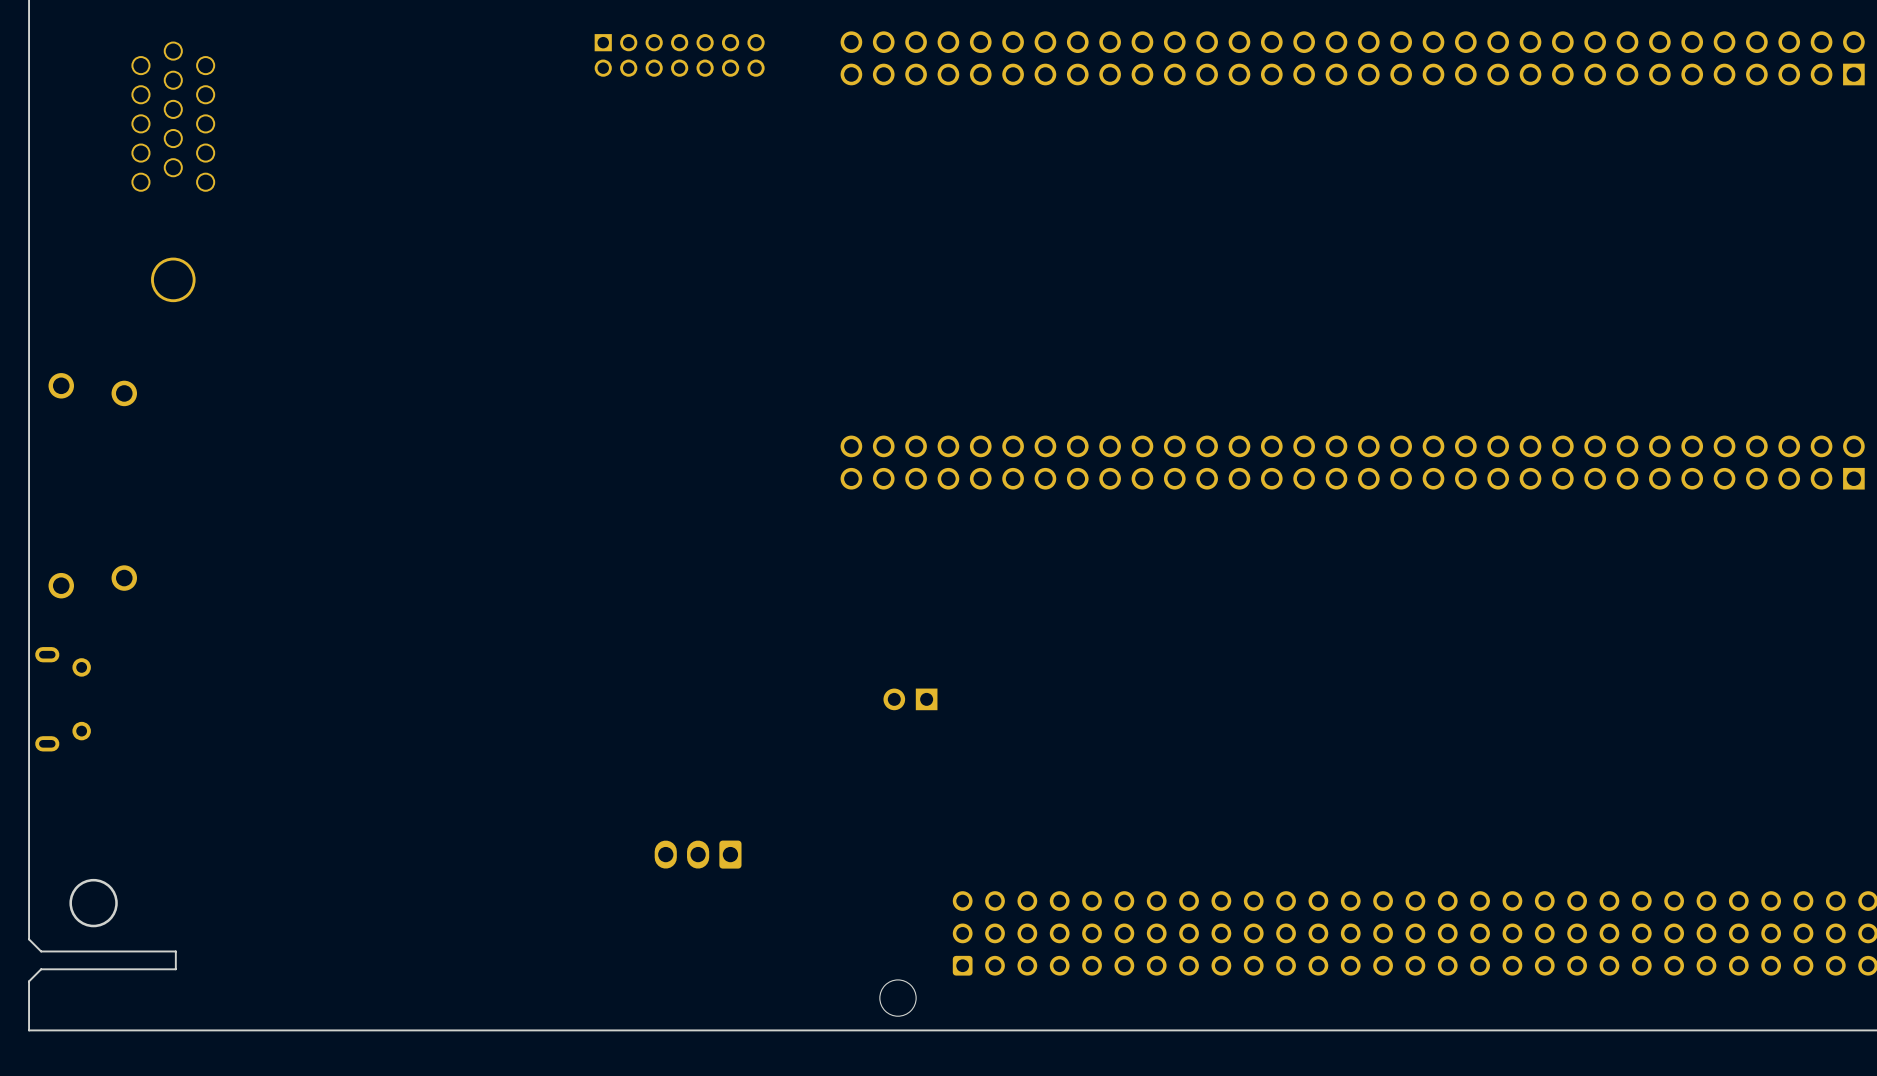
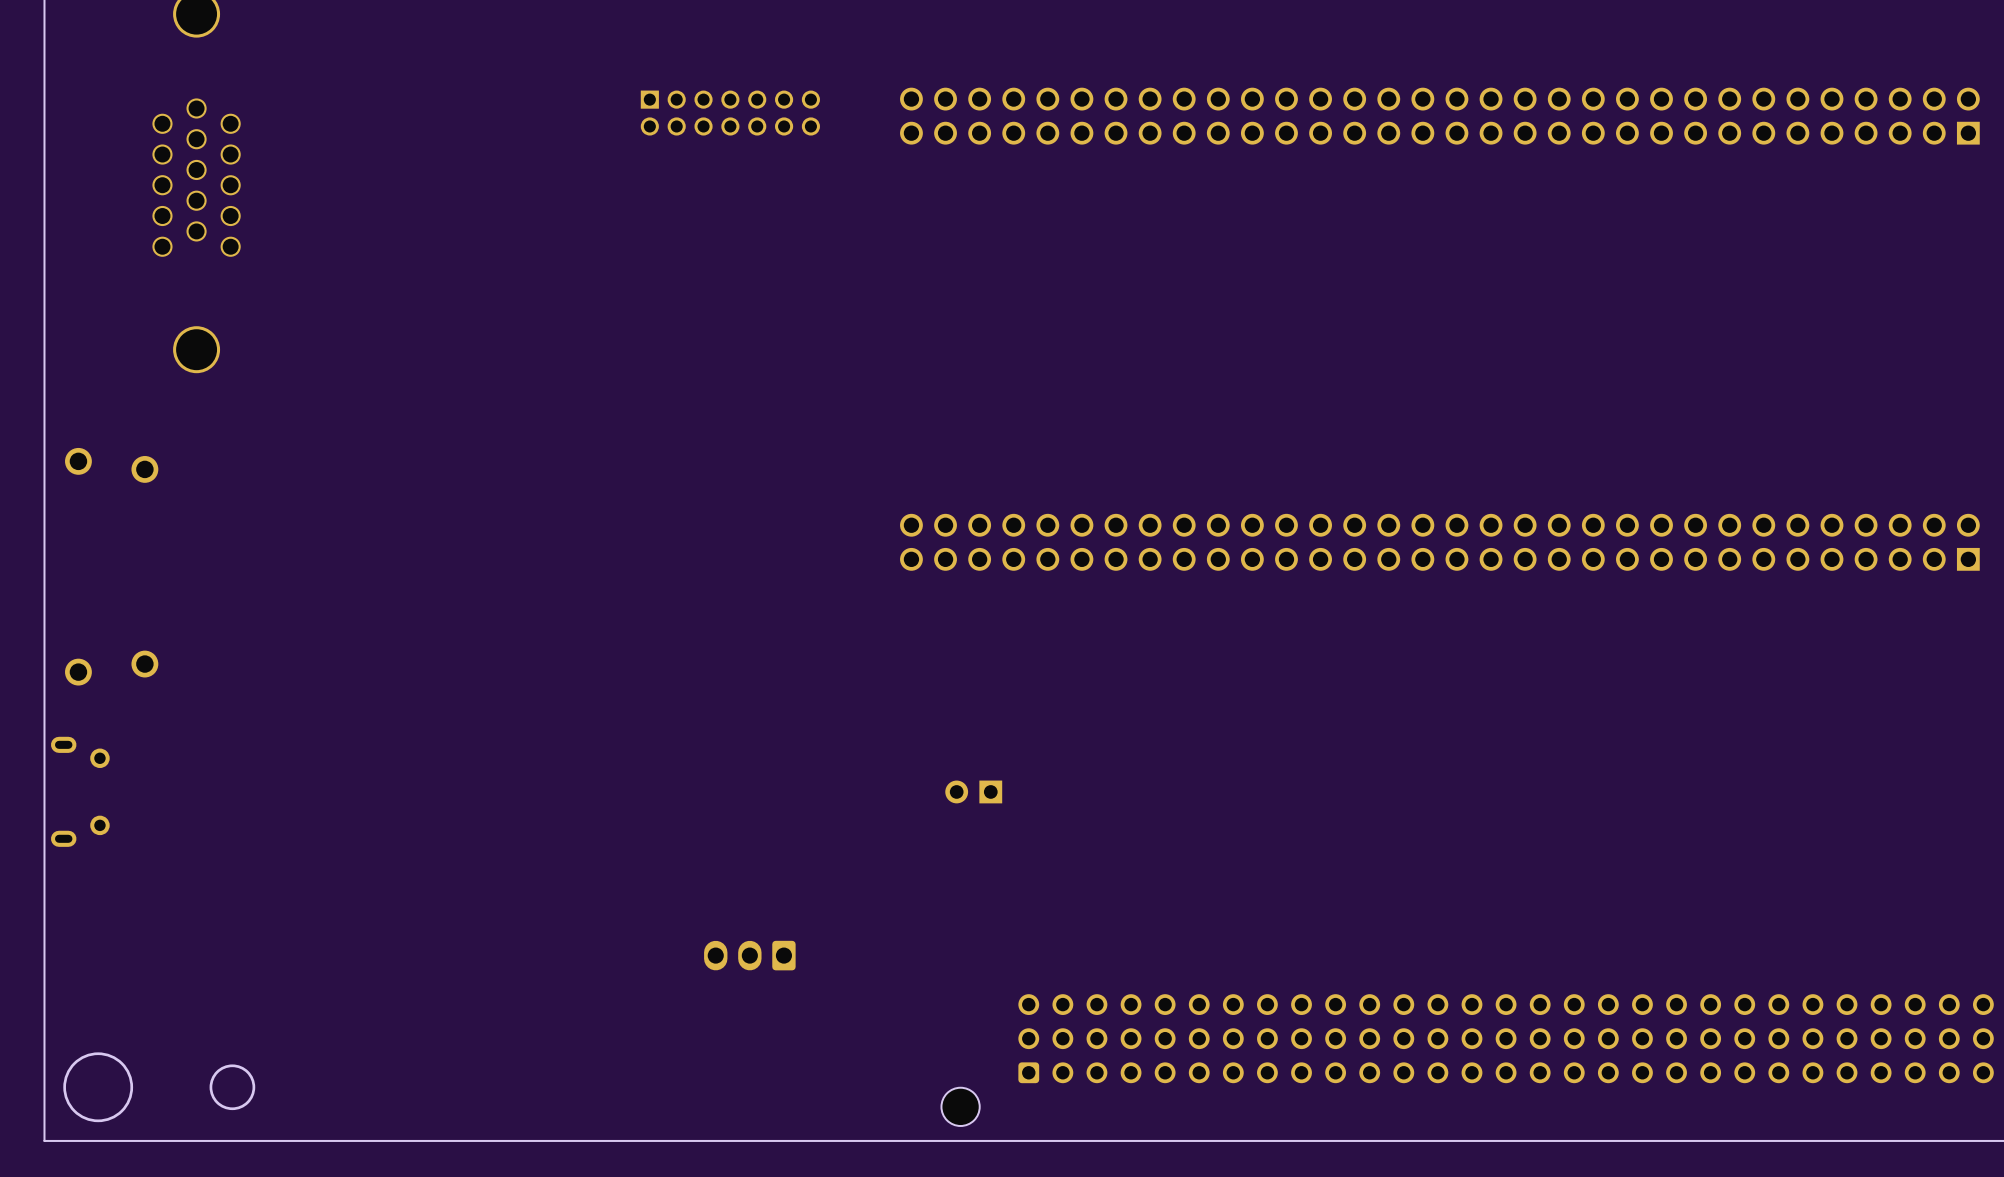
round board edge: [69, 878, 118, 928] -> none
board edge: (29, 939) (41, 951) (175, 951) (175, 969) (41, 969) (29, 981) -> (44, 1044) (44, 1089)
round board edge: none -> [63, 1052, 134, 1123]
round board edge: none -> [209, 1064, 256, 1111]

